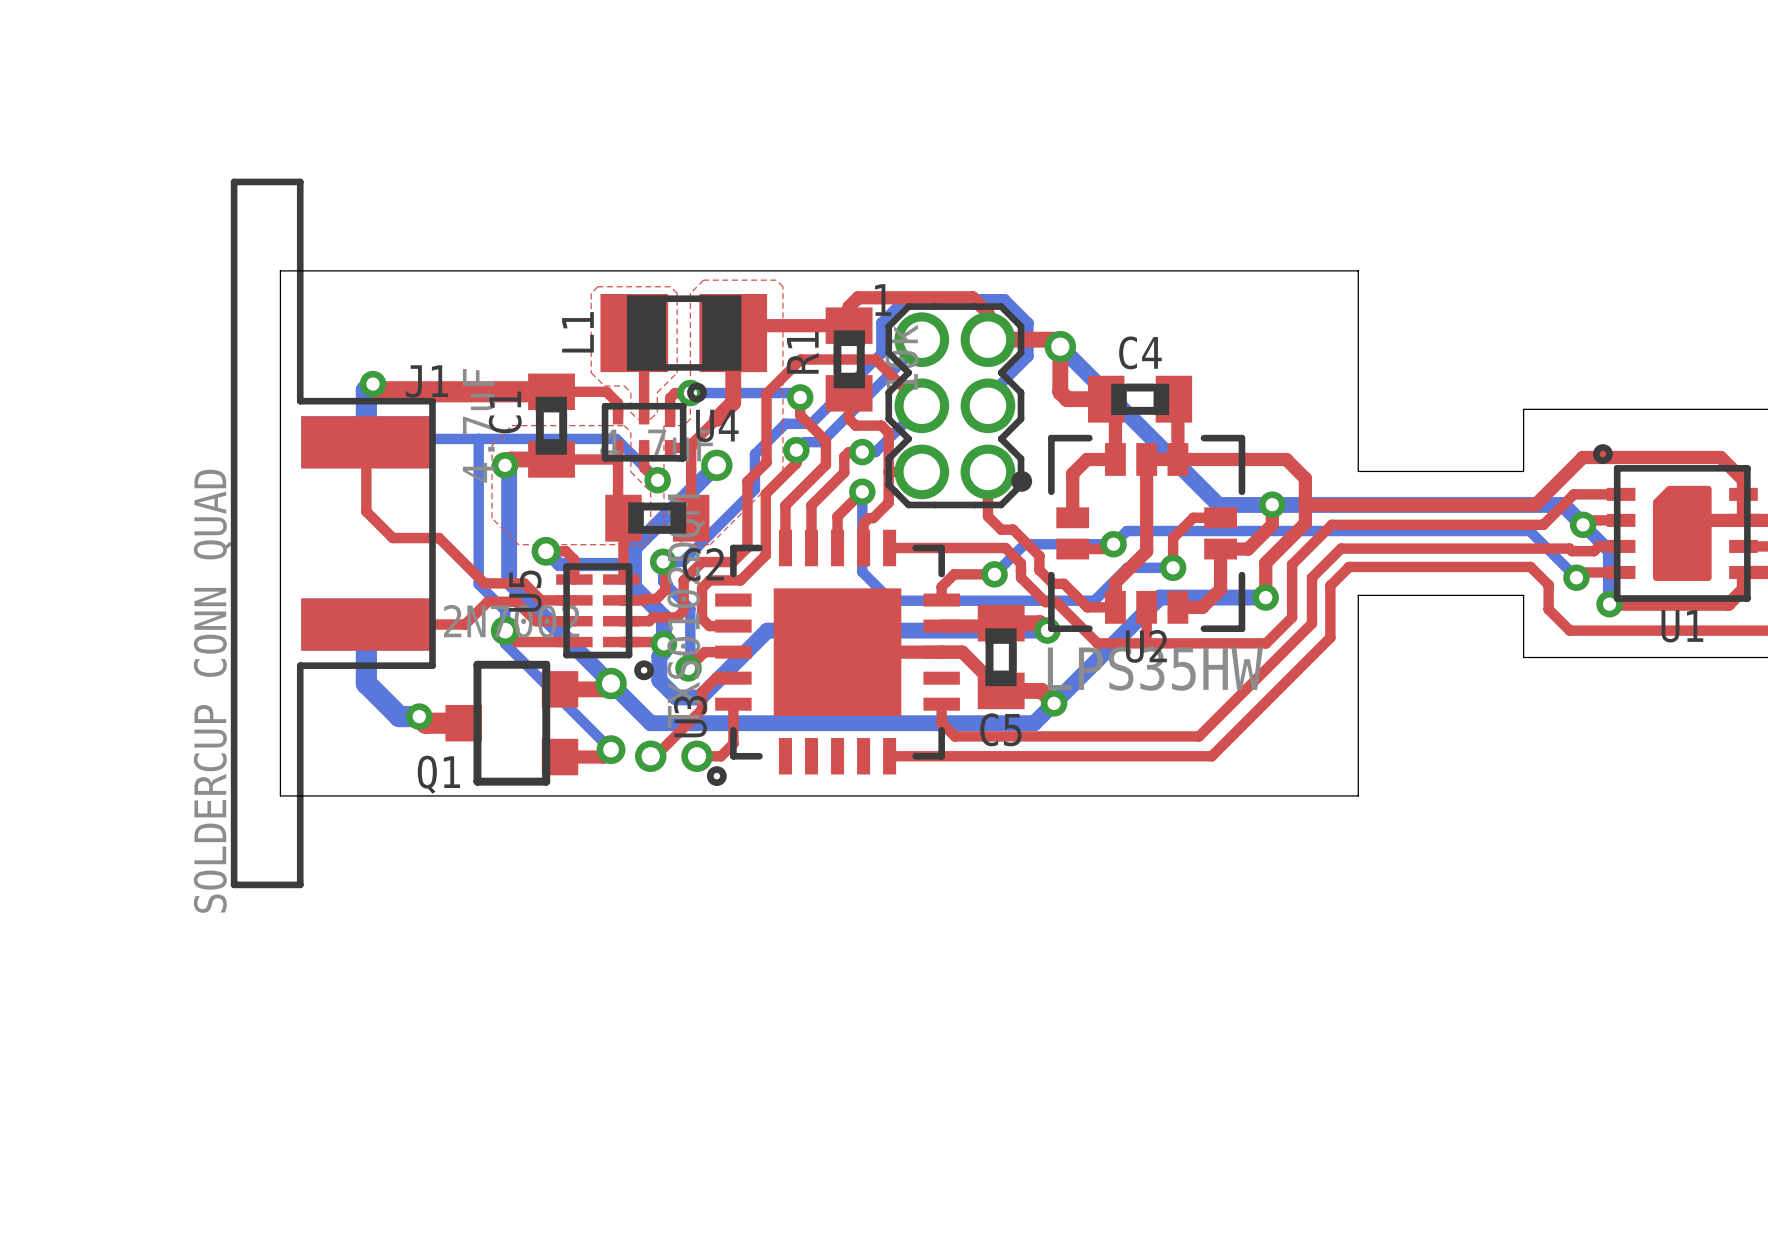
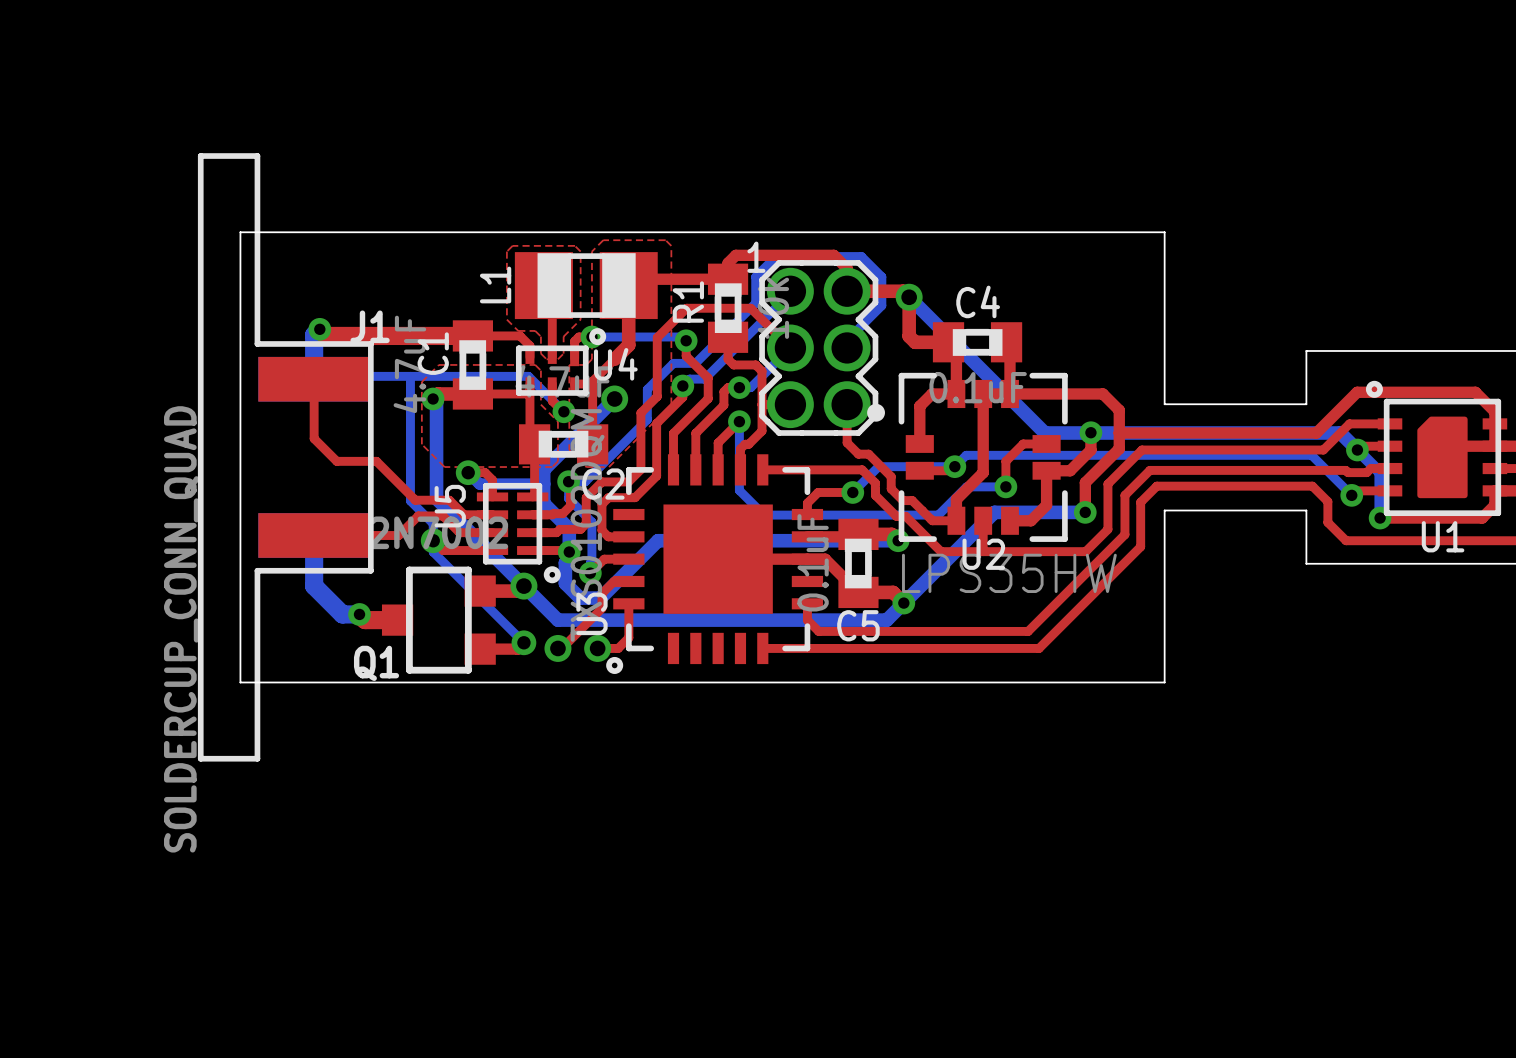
C4 value: none -> 0.1uF (978, 387)
C5 value: none -> 0.1uF (813, 562)

